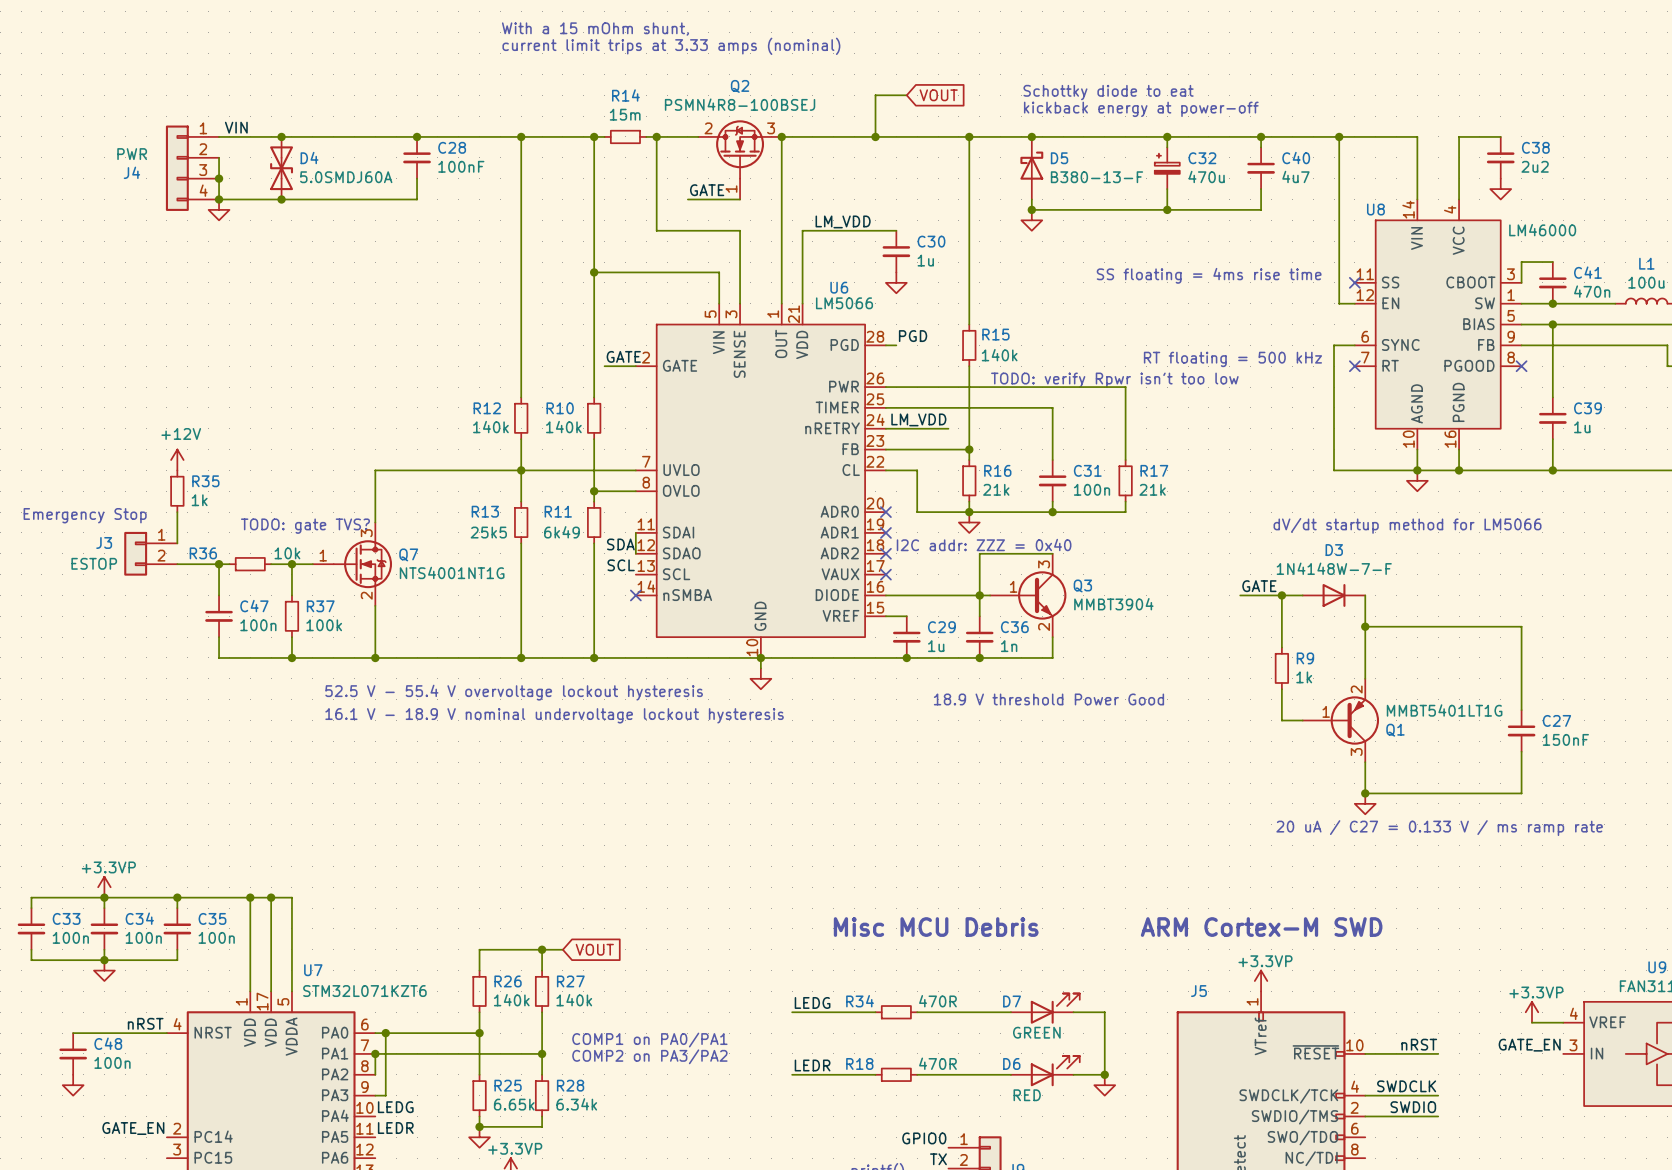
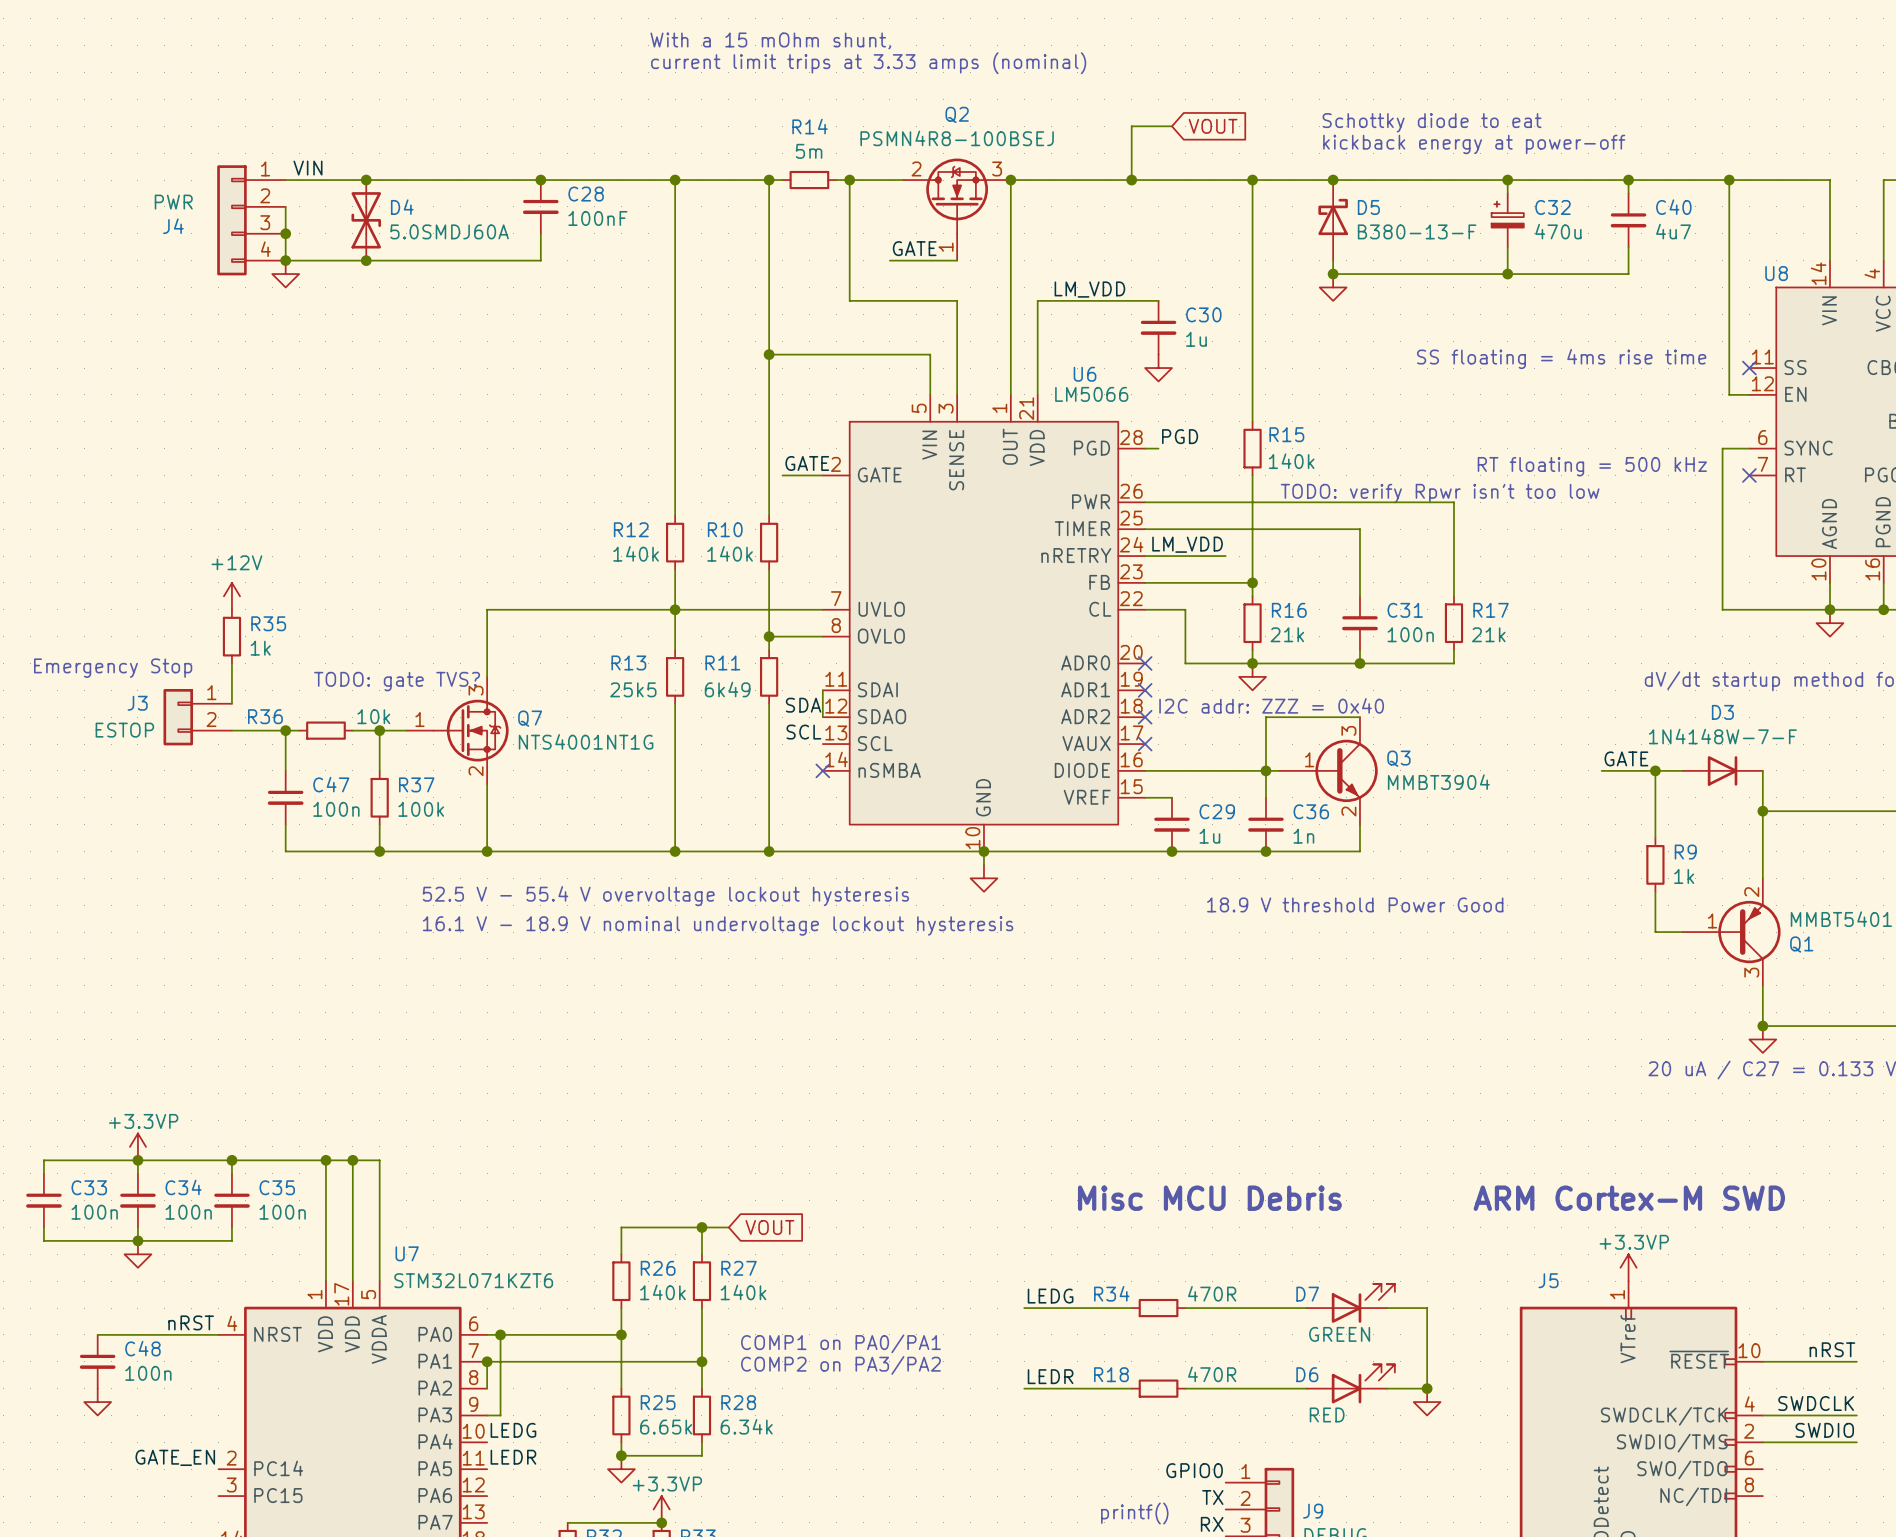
R14 value: 15m (625, 114) -> 5m (809, 151)

